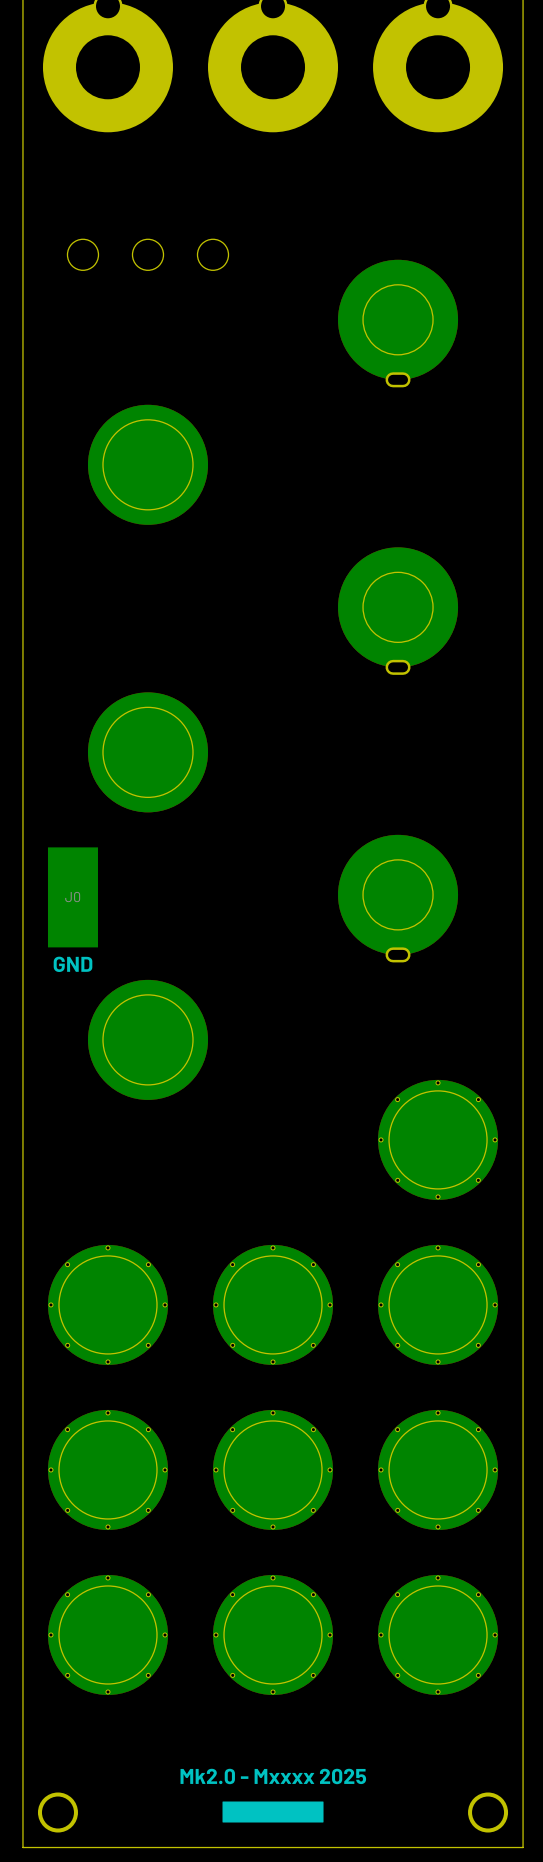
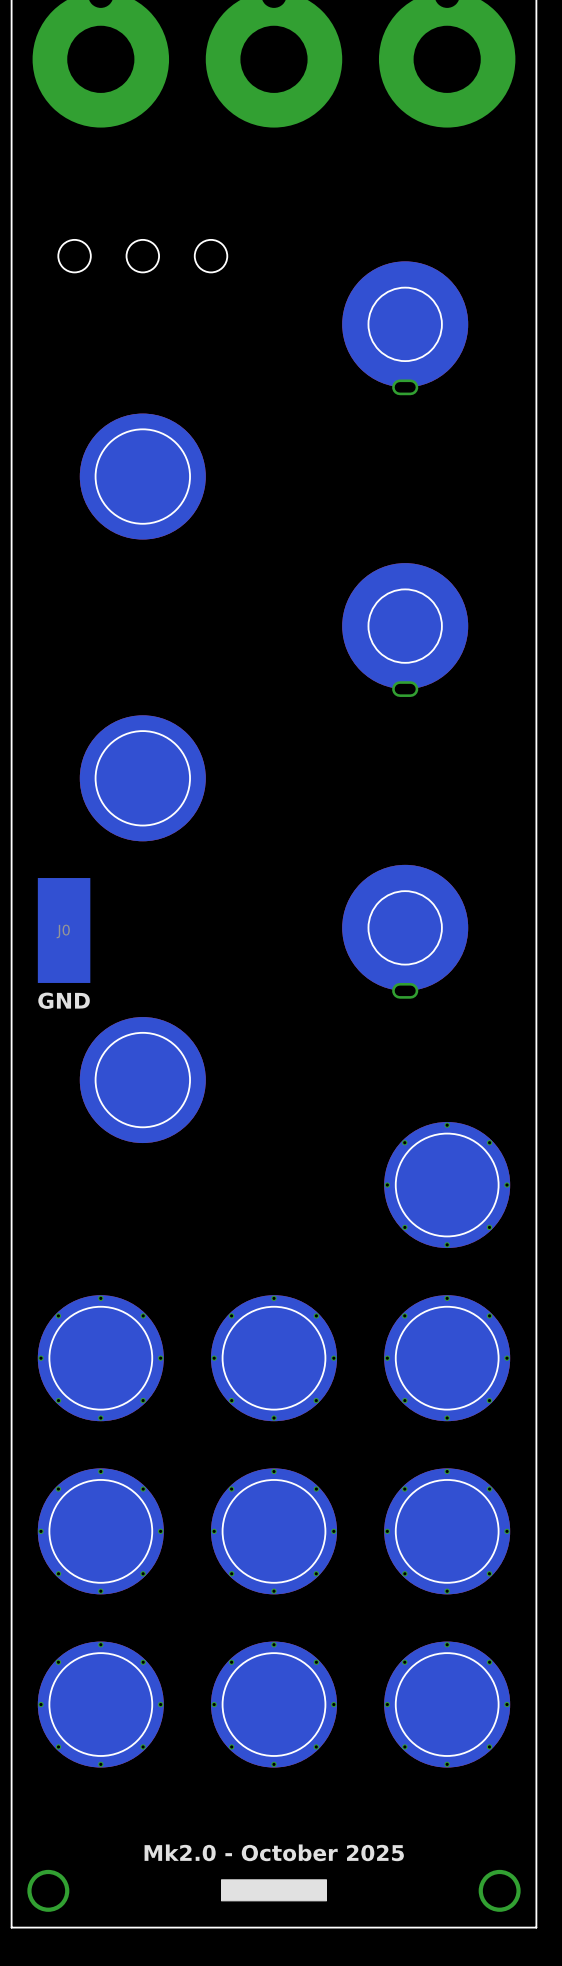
text: Mk2.0 - Mxxxx 2025 (273, 1776) -> Mk2.0 - October 2025 (274, 1852)

